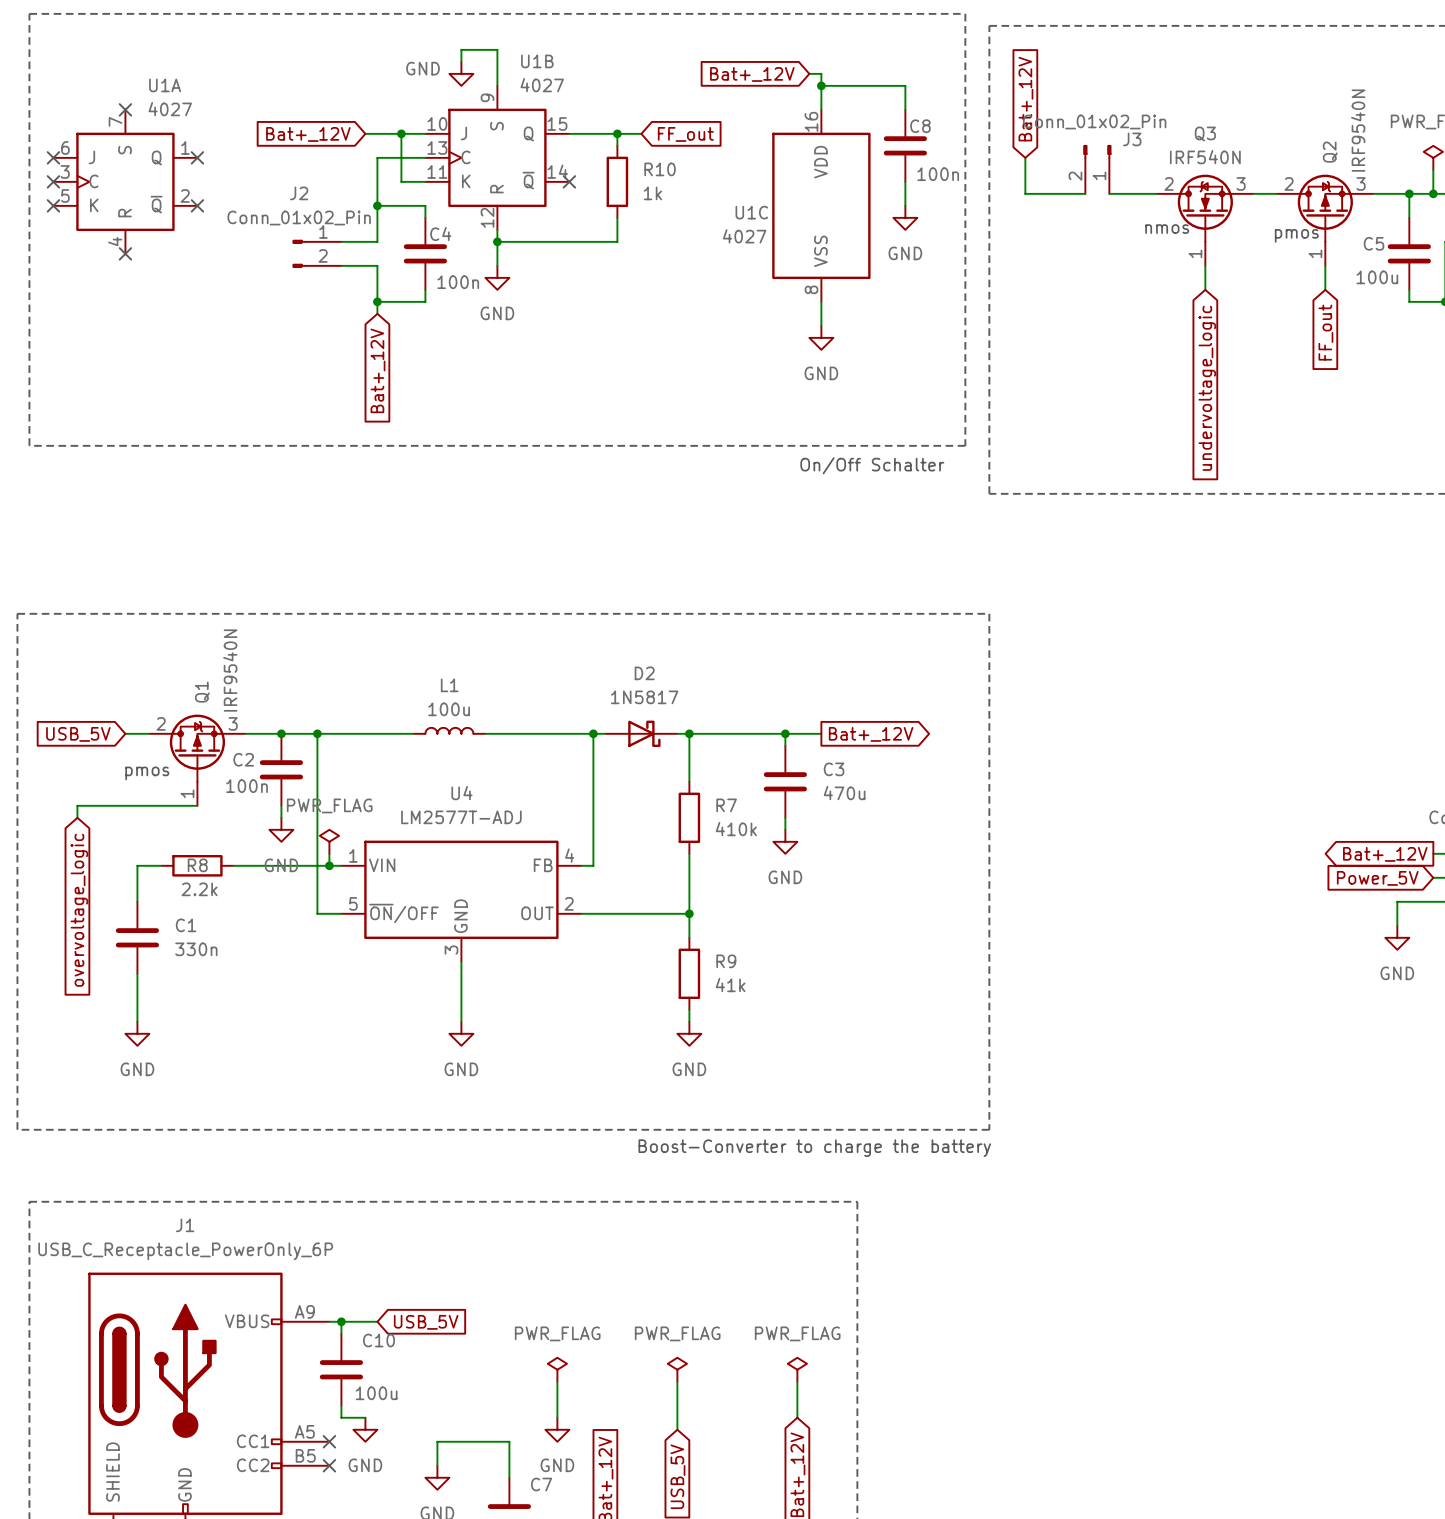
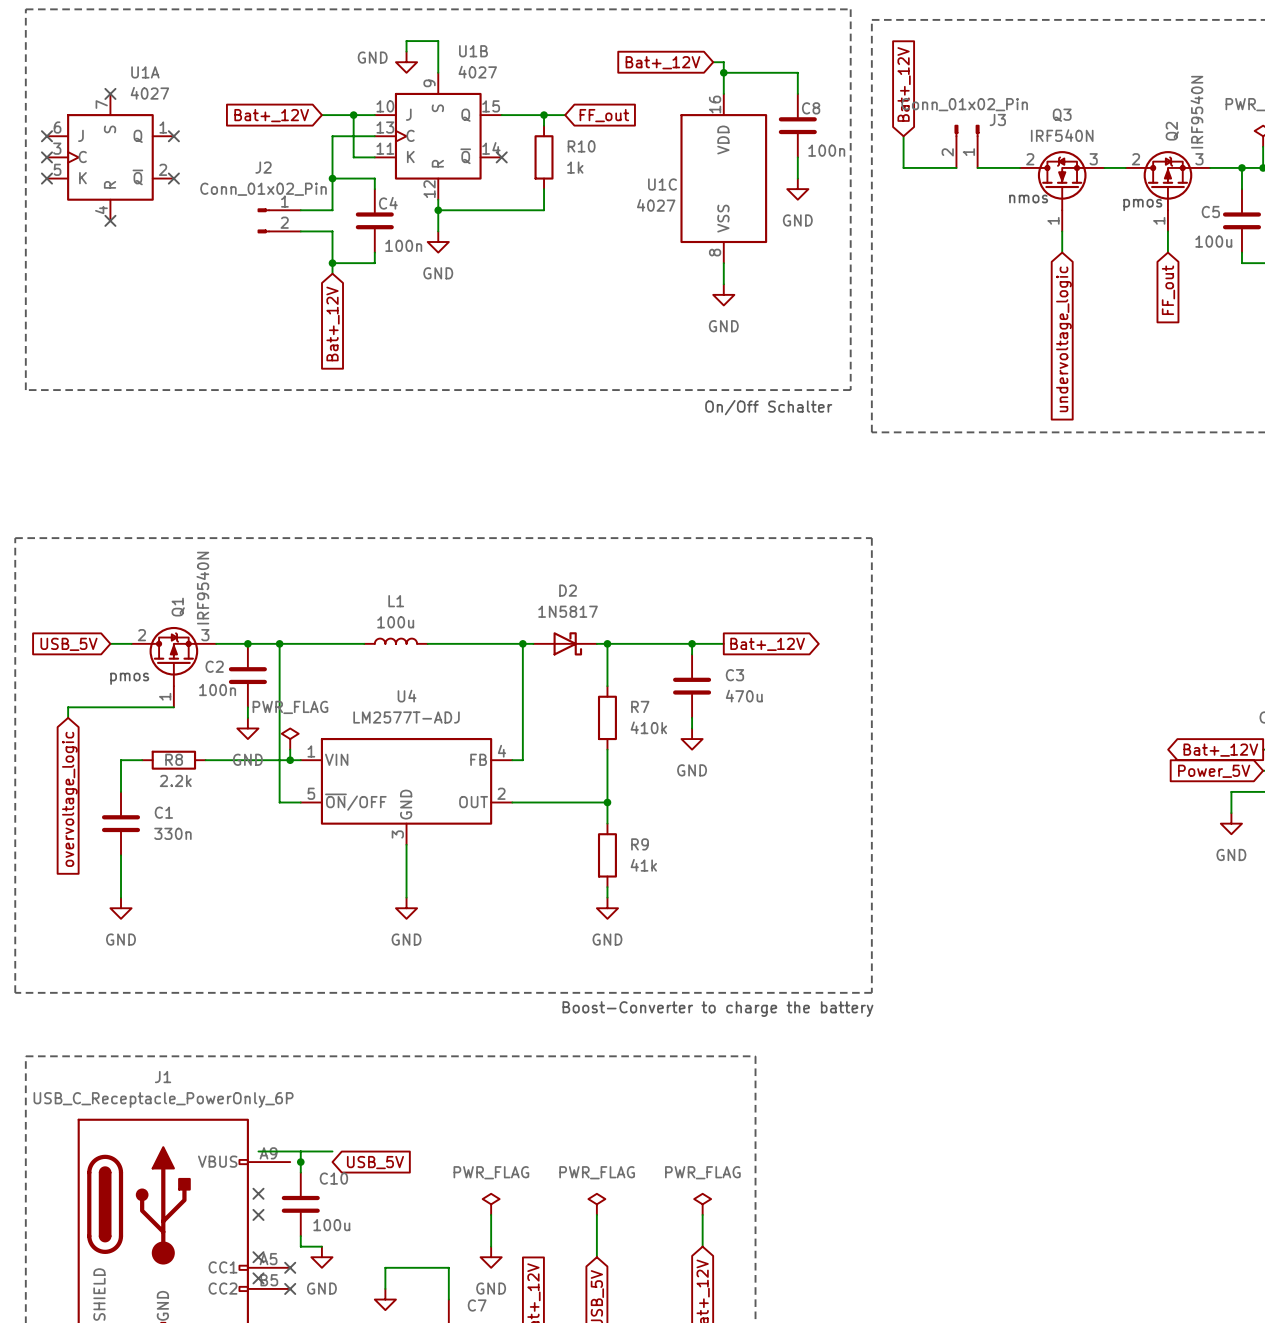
wire: none -> (258, 1151) (332, 1151)
wire: none -> (300, 1151) (300, 1162)
wire: (329, 1321) (377, 1321) -> none
no-connect mark: none -> (258, 1193)
no-connect mark: none -> (258, 1214)
no-connect mark: none -> (258, 1257)
no-connect mark: none -> (258, 1278)

